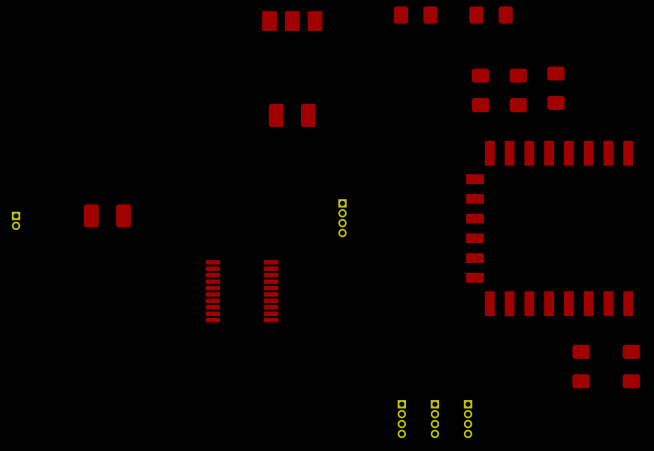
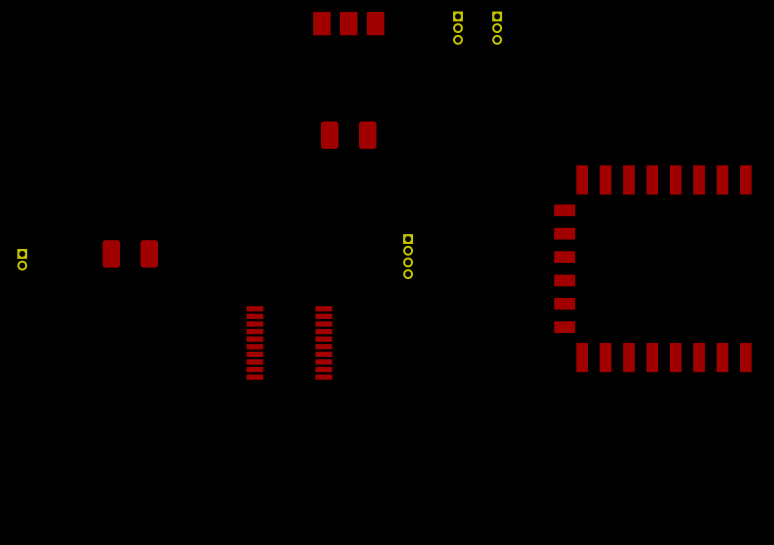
part: (415, 15) -> none
part: (491, 15) -> none
part: none -> (457, 28)
part: none -> (497, 28)
part: (555, 88) -> none
part: (480, 90) -> none
part: (518, 90) -> none
part: (581, 366) -> none
part: (631, 366) -> none
part: (401, 419) -> none
part: (434, 419) -> none
part: (468, 419) -> none

